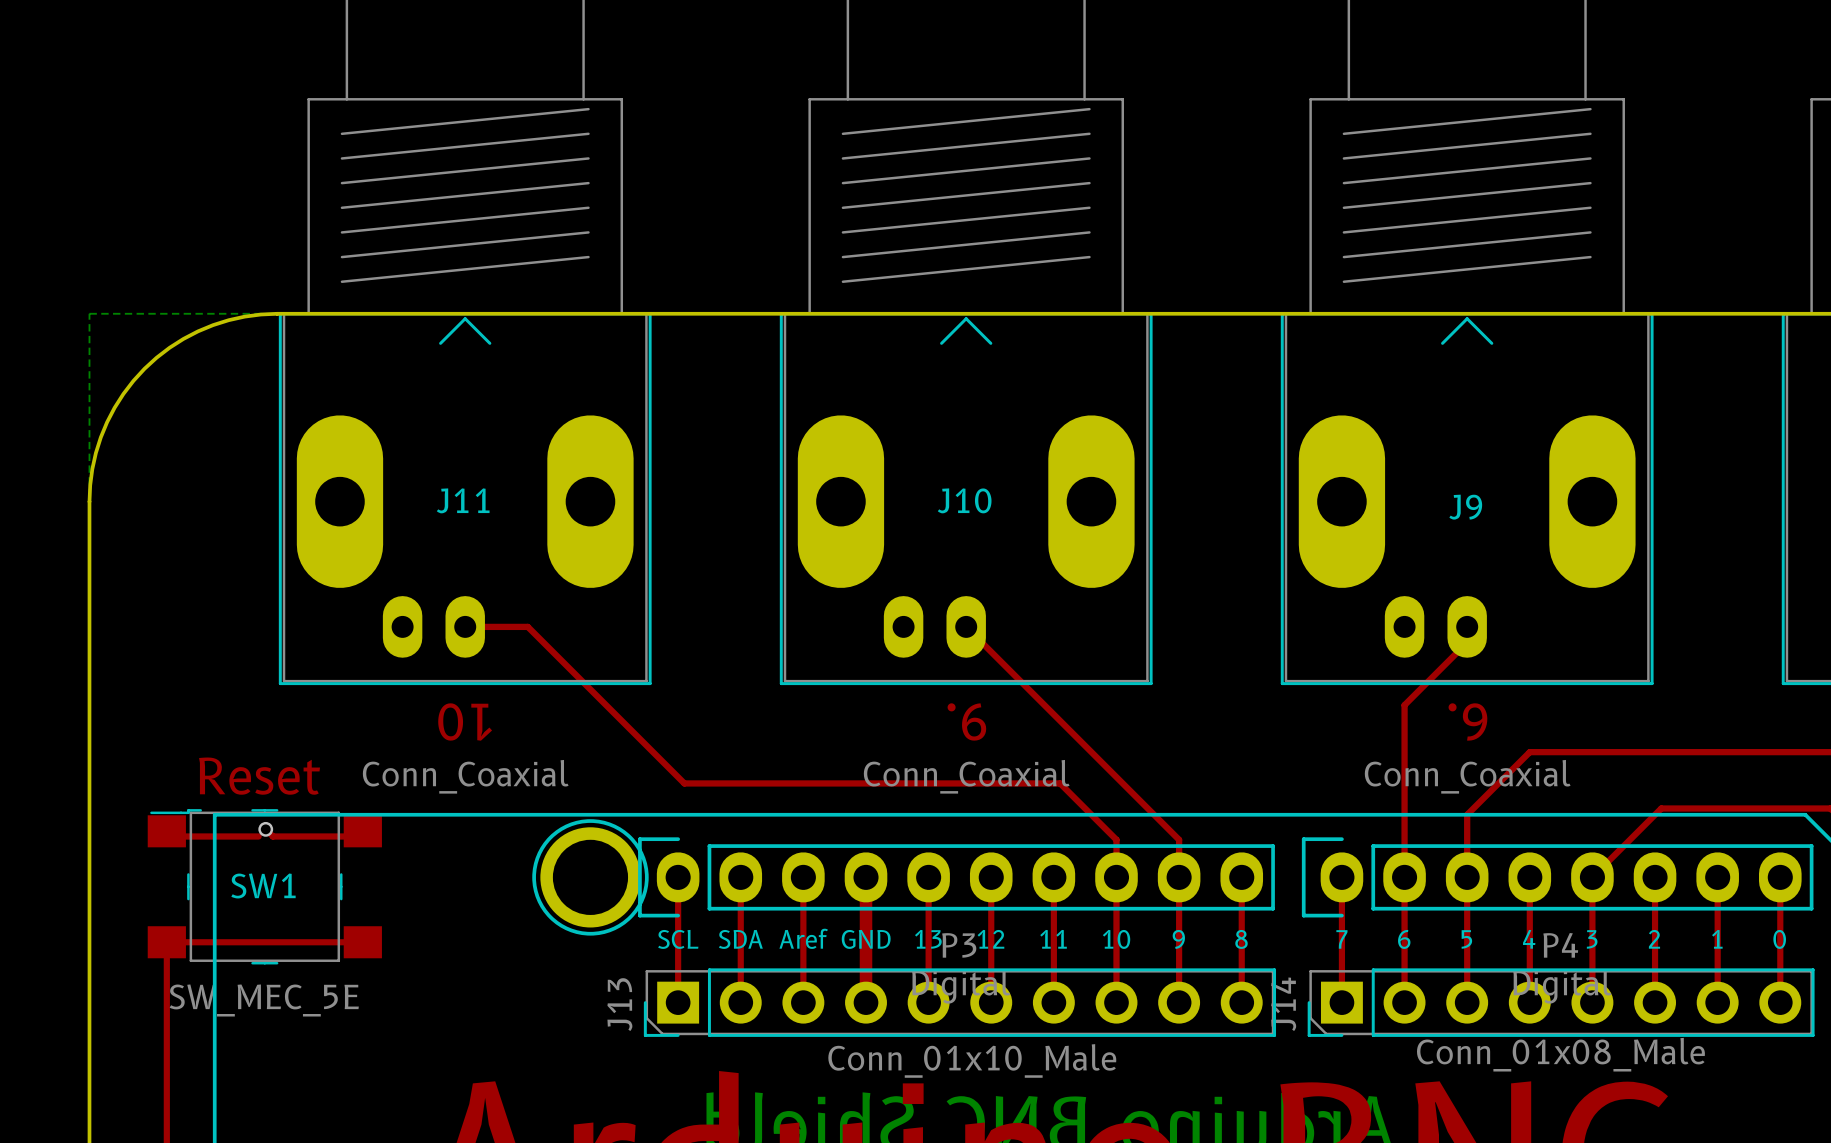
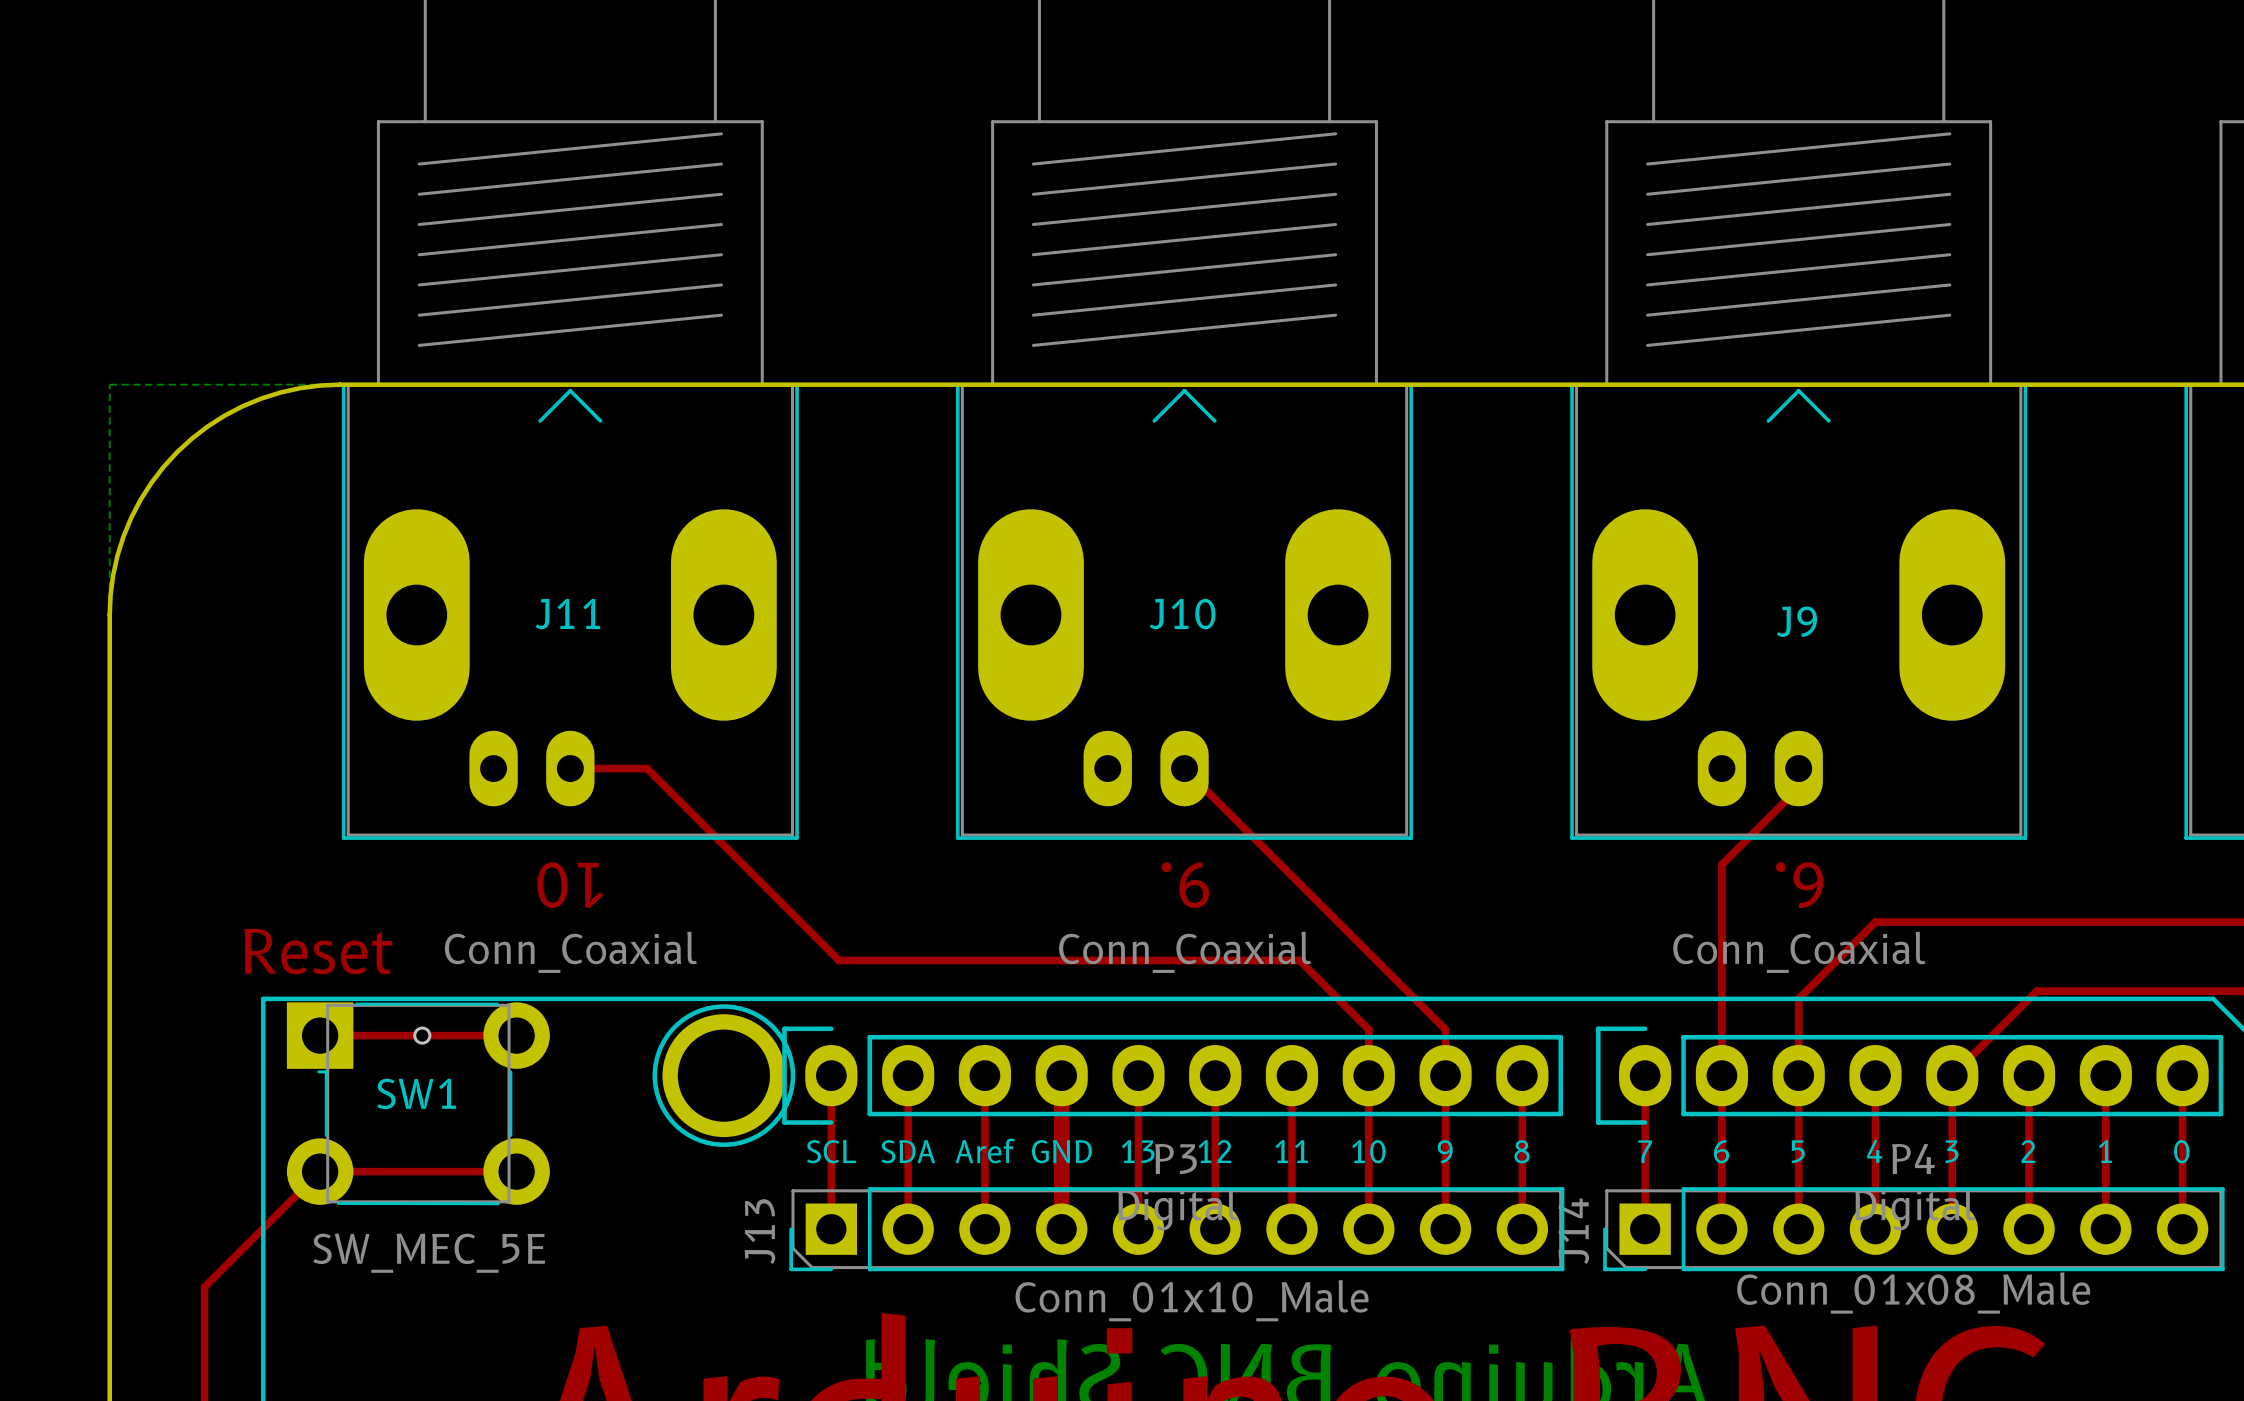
SW1 footprint: [147, 809, 382, 965] -> [286, 1002, 550, 1206]
top track: (265, 829) (272, 836) (363, 836) -> none
via position: (265, 829) -> (422, 1035)
top track: (167, 836) (258, 836) -> none
top track: none -> (320, 1035) (516, 1035)
top track: (362, 942) (166, 942) (166, 1049) -> (516, 1171) (320, 1171) (204, 1287)

